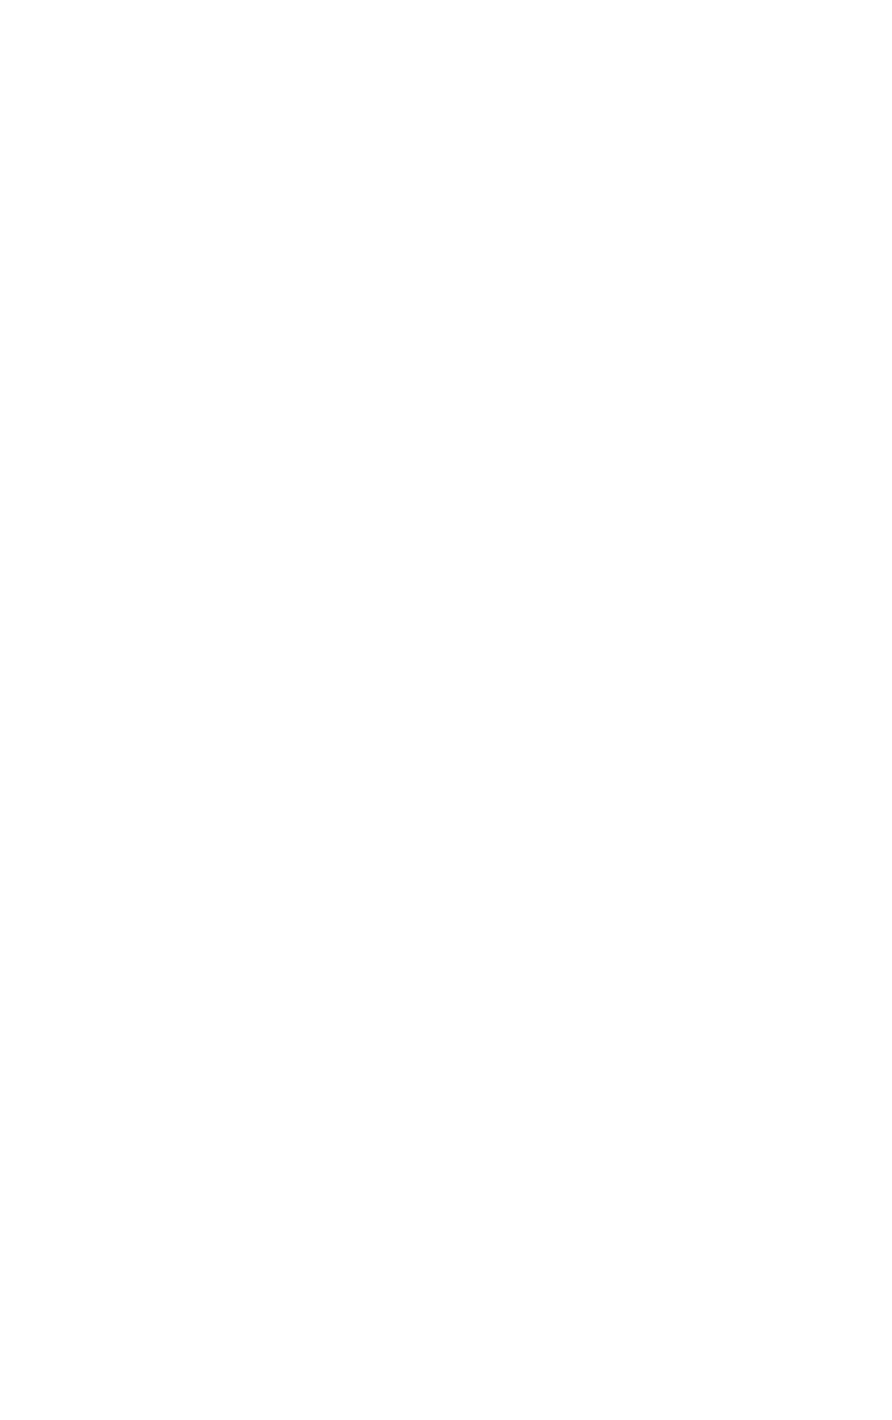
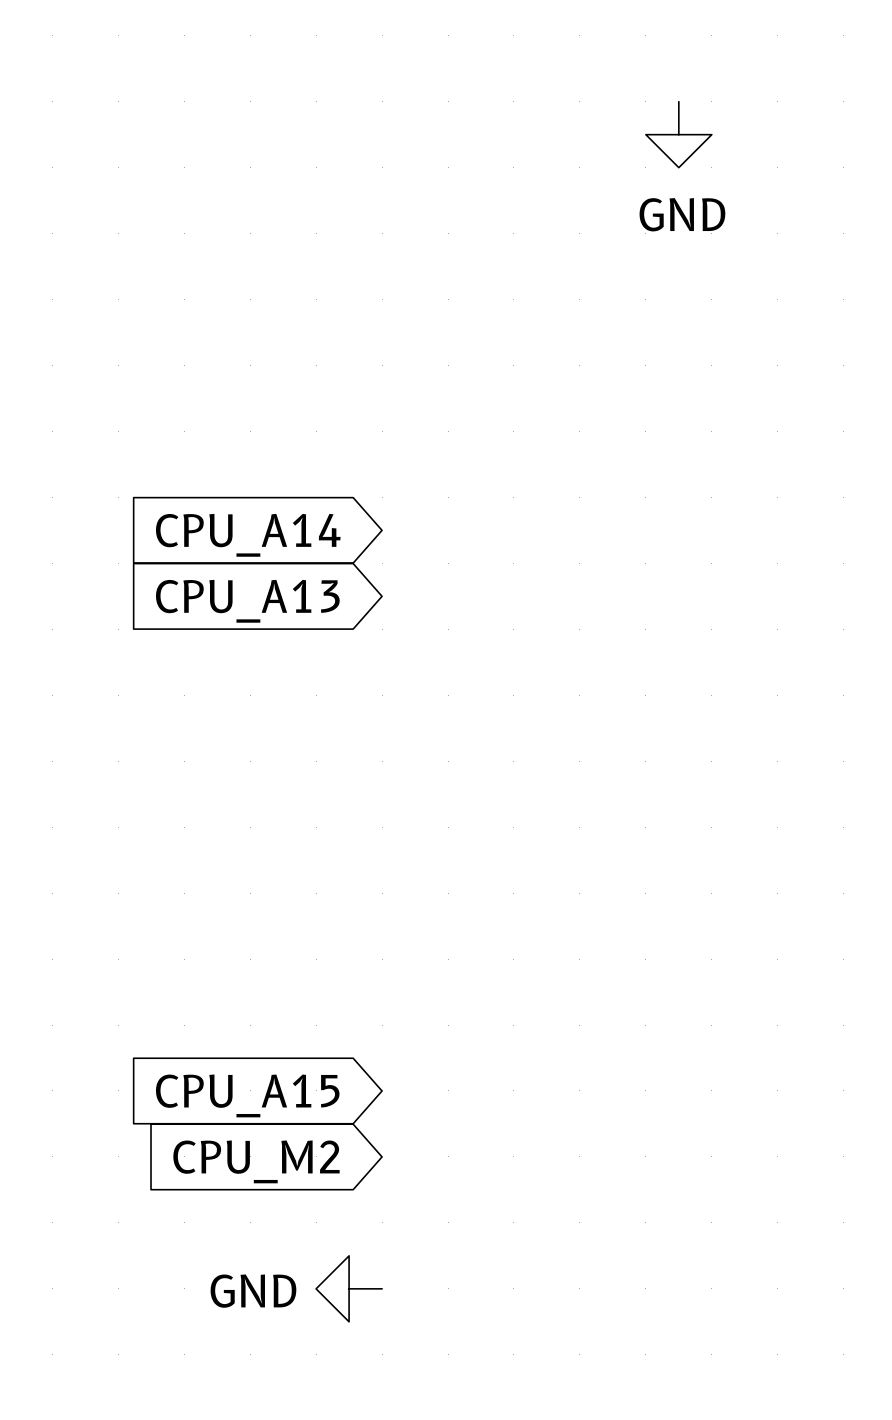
power symbol: none -> GND (678, 134)
global label: none -> CPU_A14 (248, 535)
global label: none -> CPU_A13 (247, 601)
global label: none -> CPU_A15 (247, 1095)
global label: none -> CPU_M2 (256, 1161)
power symbol: none -> GND (349, 1288)

